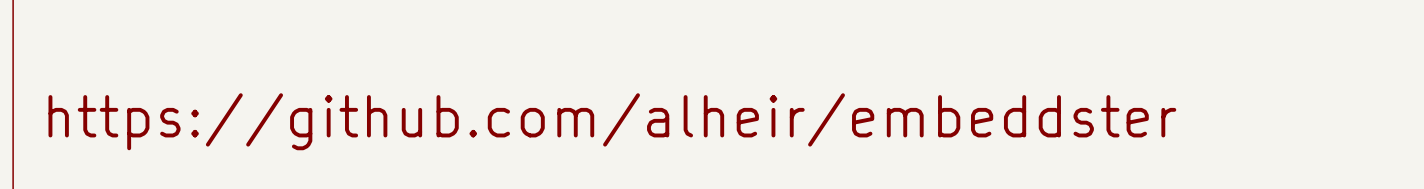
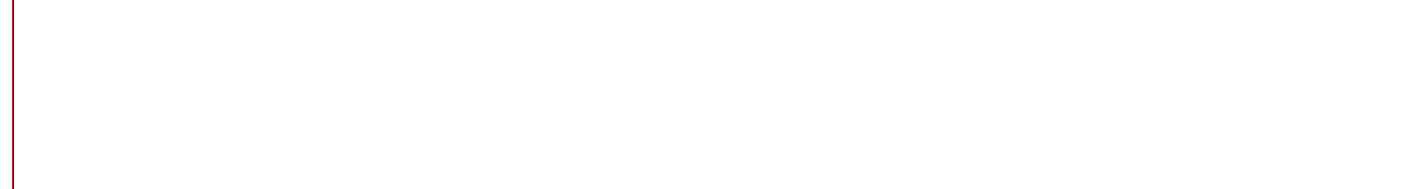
title block: https://github.com/alheir/embeddster (612, 121) -> none

